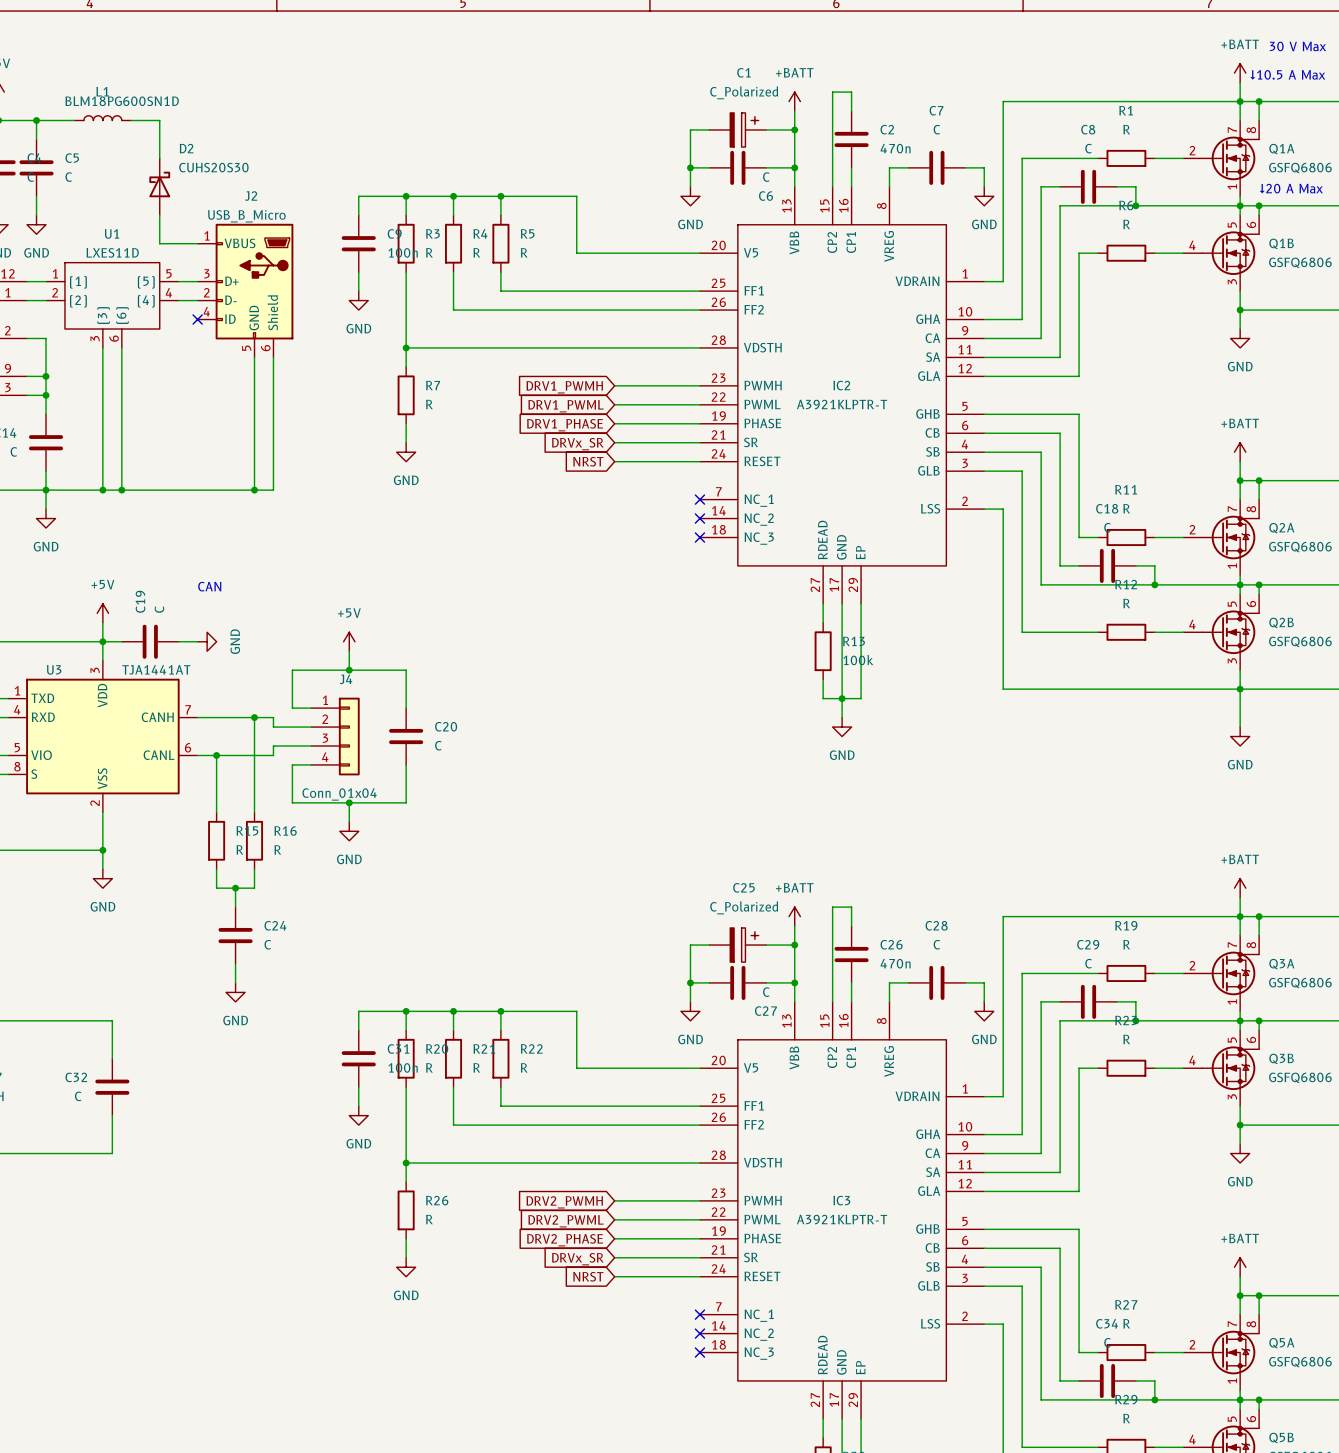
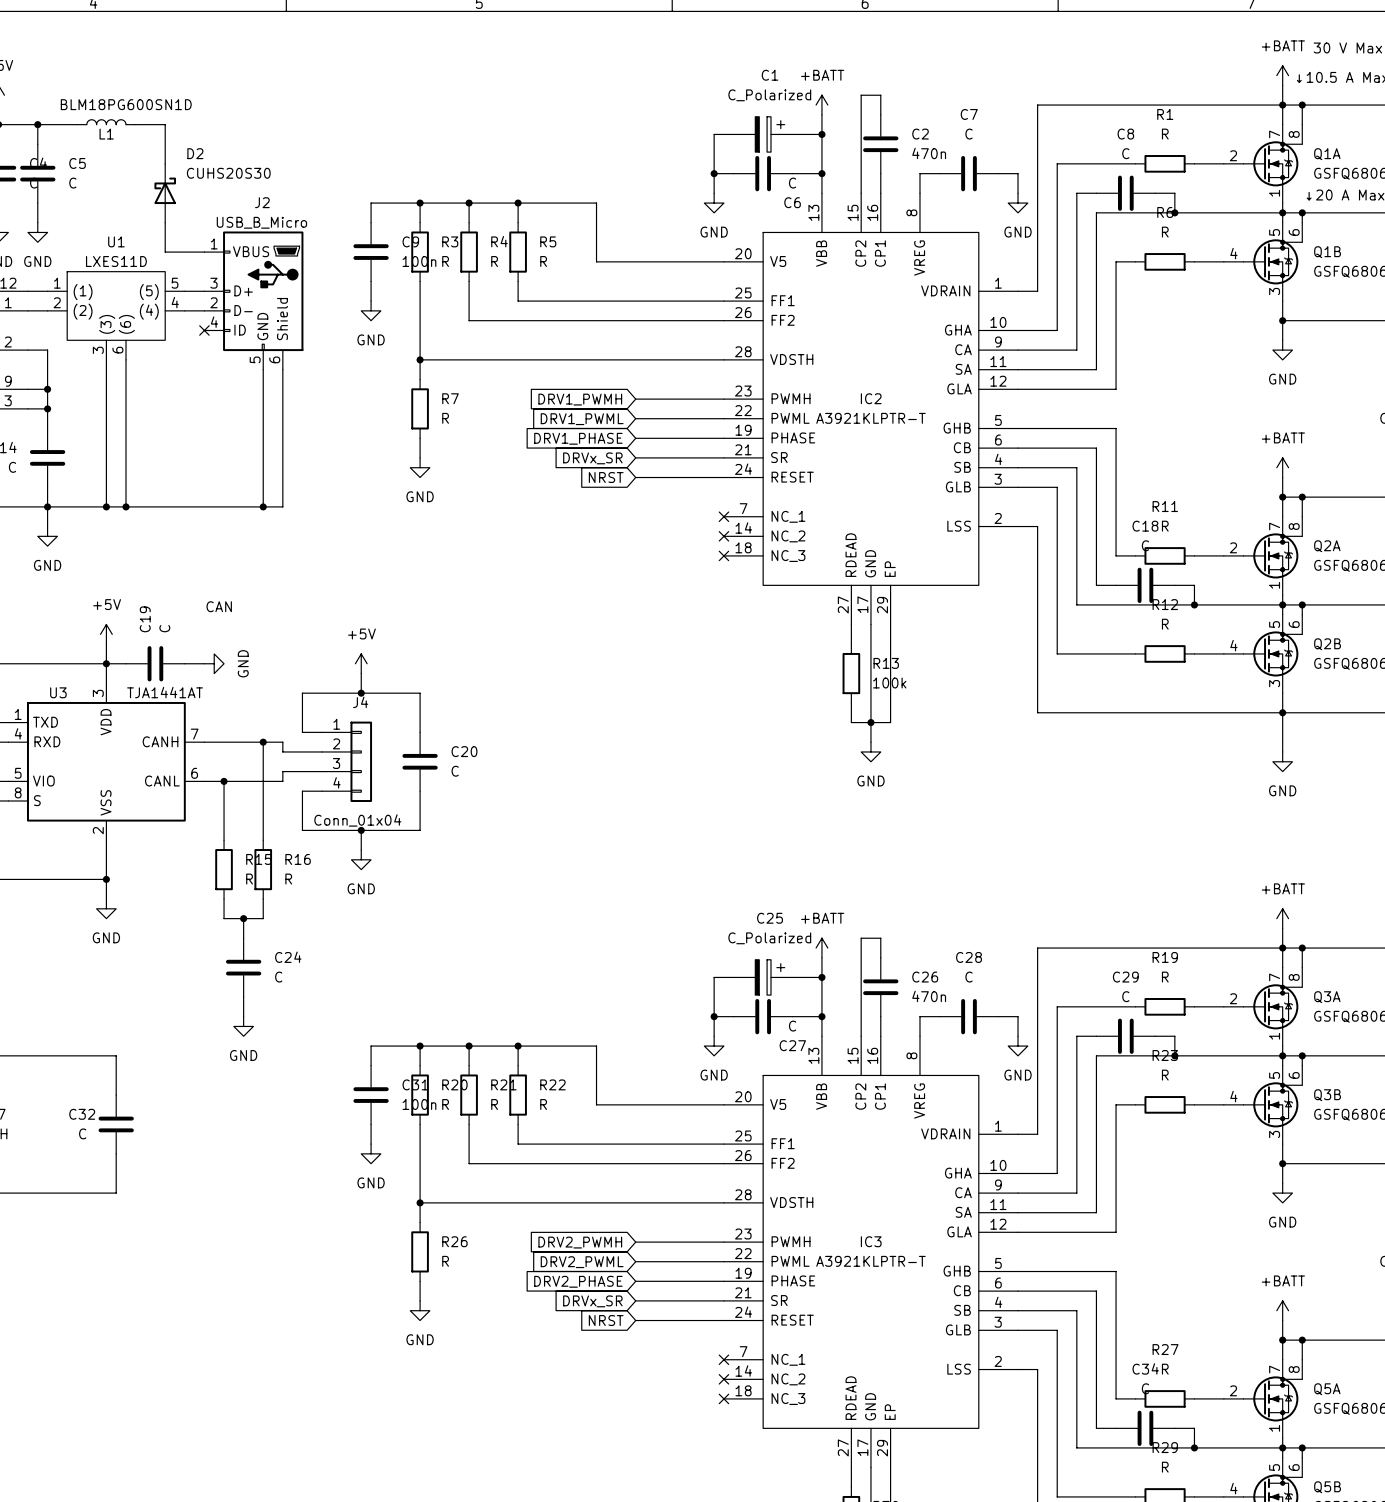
L1 name position: L1 (102, 91) -> L1 (106, 134)

